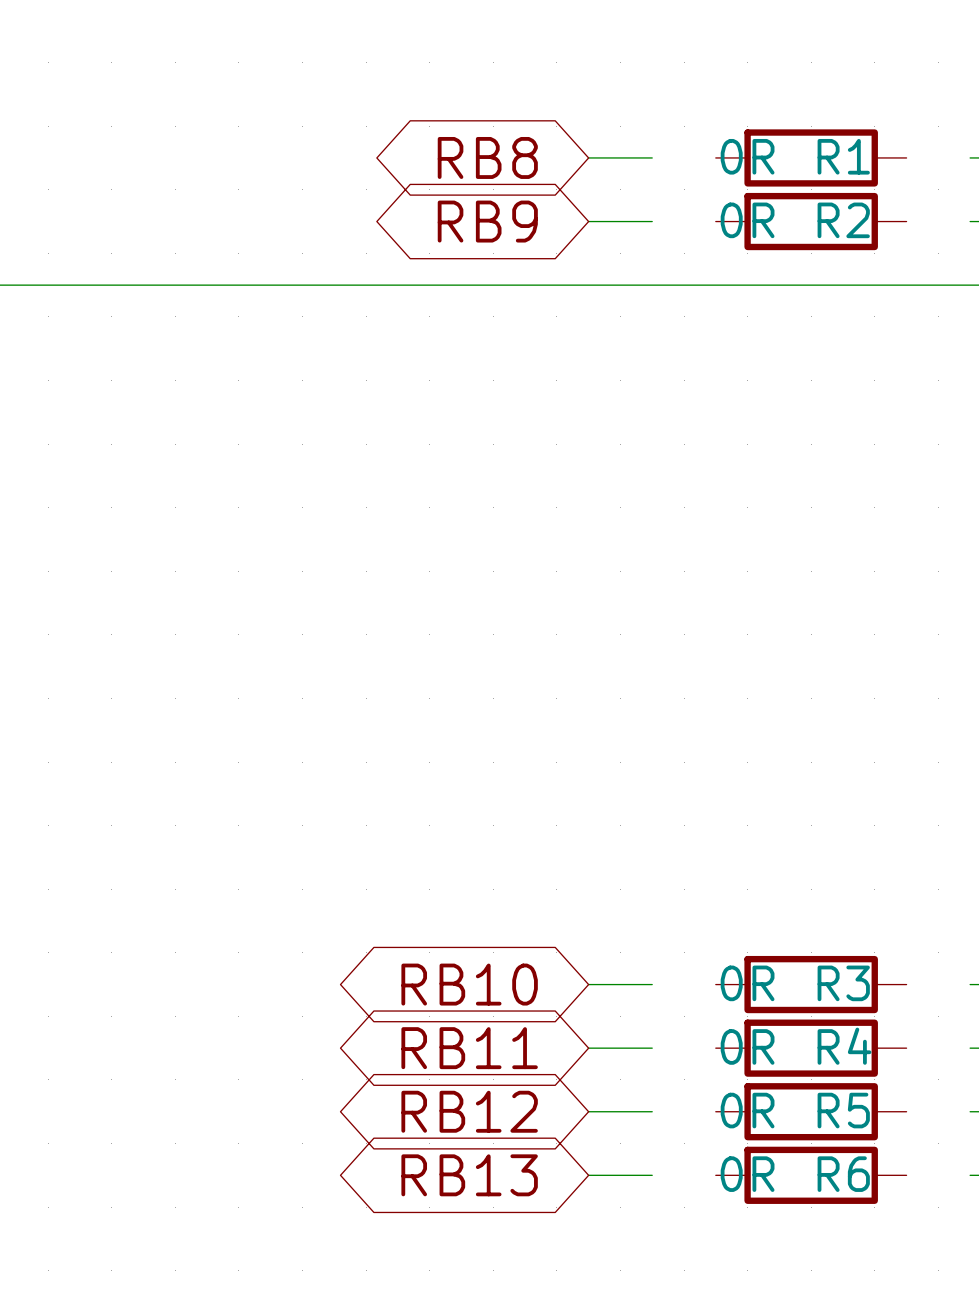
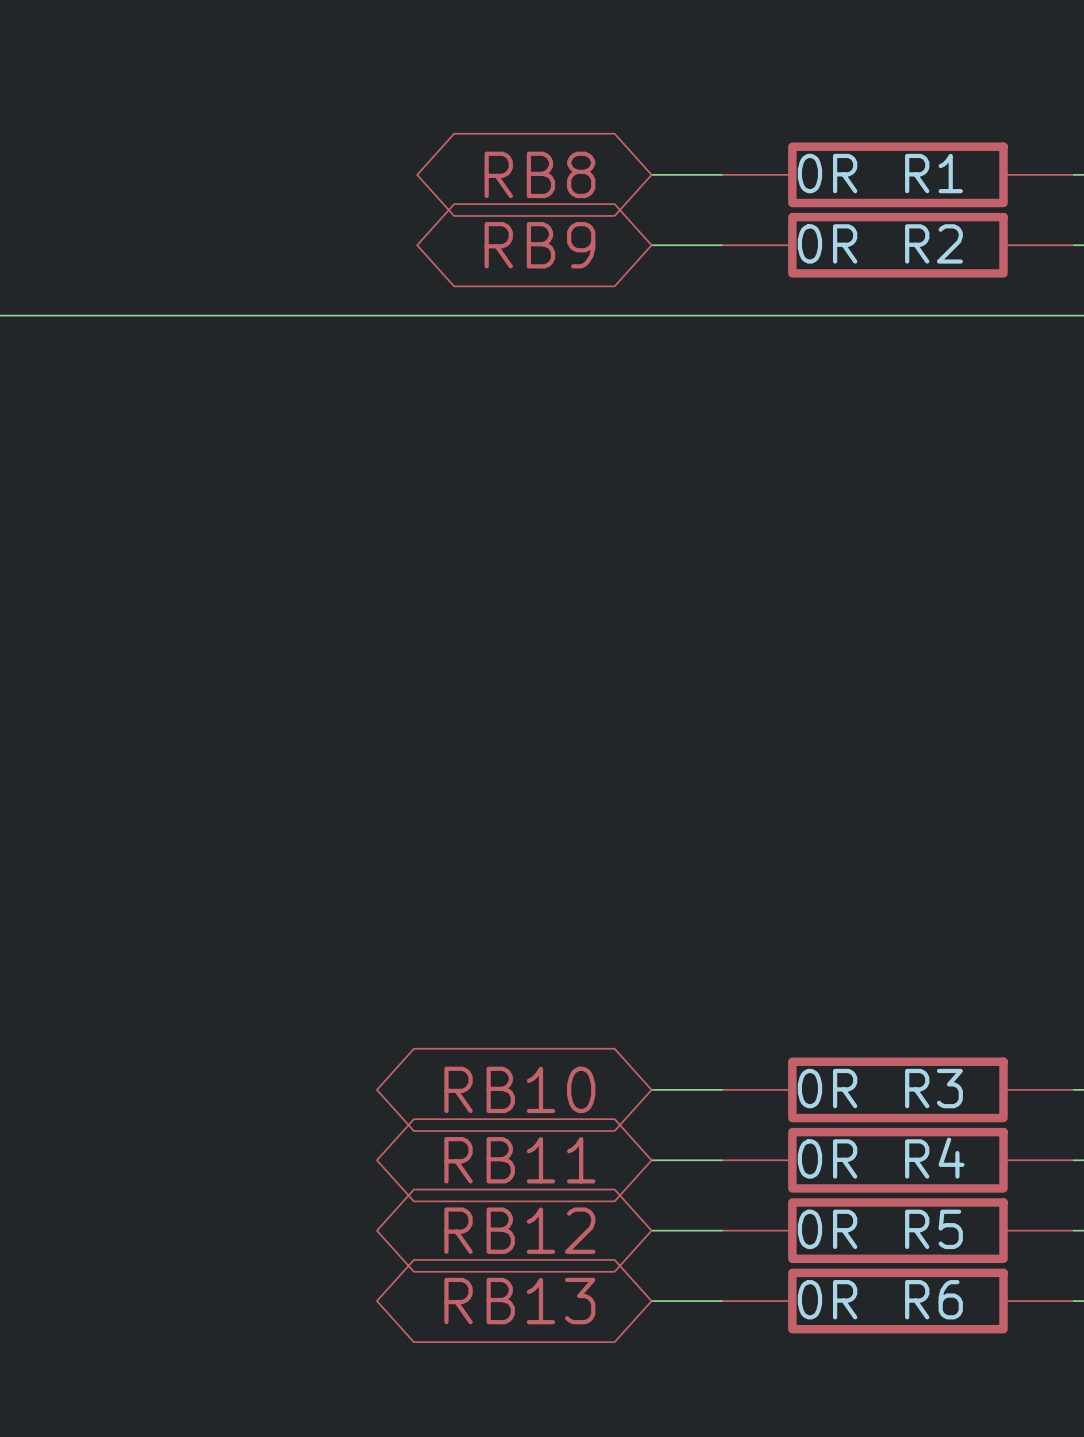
R1 symbol: [715, 129, 907, 187] -> [721, 142, 1074, 208]
R2 symbol: [715, 192, 907, 251] -> [721, 212, 1074, 278]
R3 symbol: [715, 955, 907, 1014] -> [721, 1057, 1074, 1123]
R4 symbol: [715, 1019, 907, 1077] -> [721, 1127, 1074, 1193]
R5 symbol: [715, 1083, 907, 1141] -> [721, 1198, 1074, 1264]
R6 symbol: [715, 1146, 907, 1204] -> [721, 1268, 1074, 1334]

